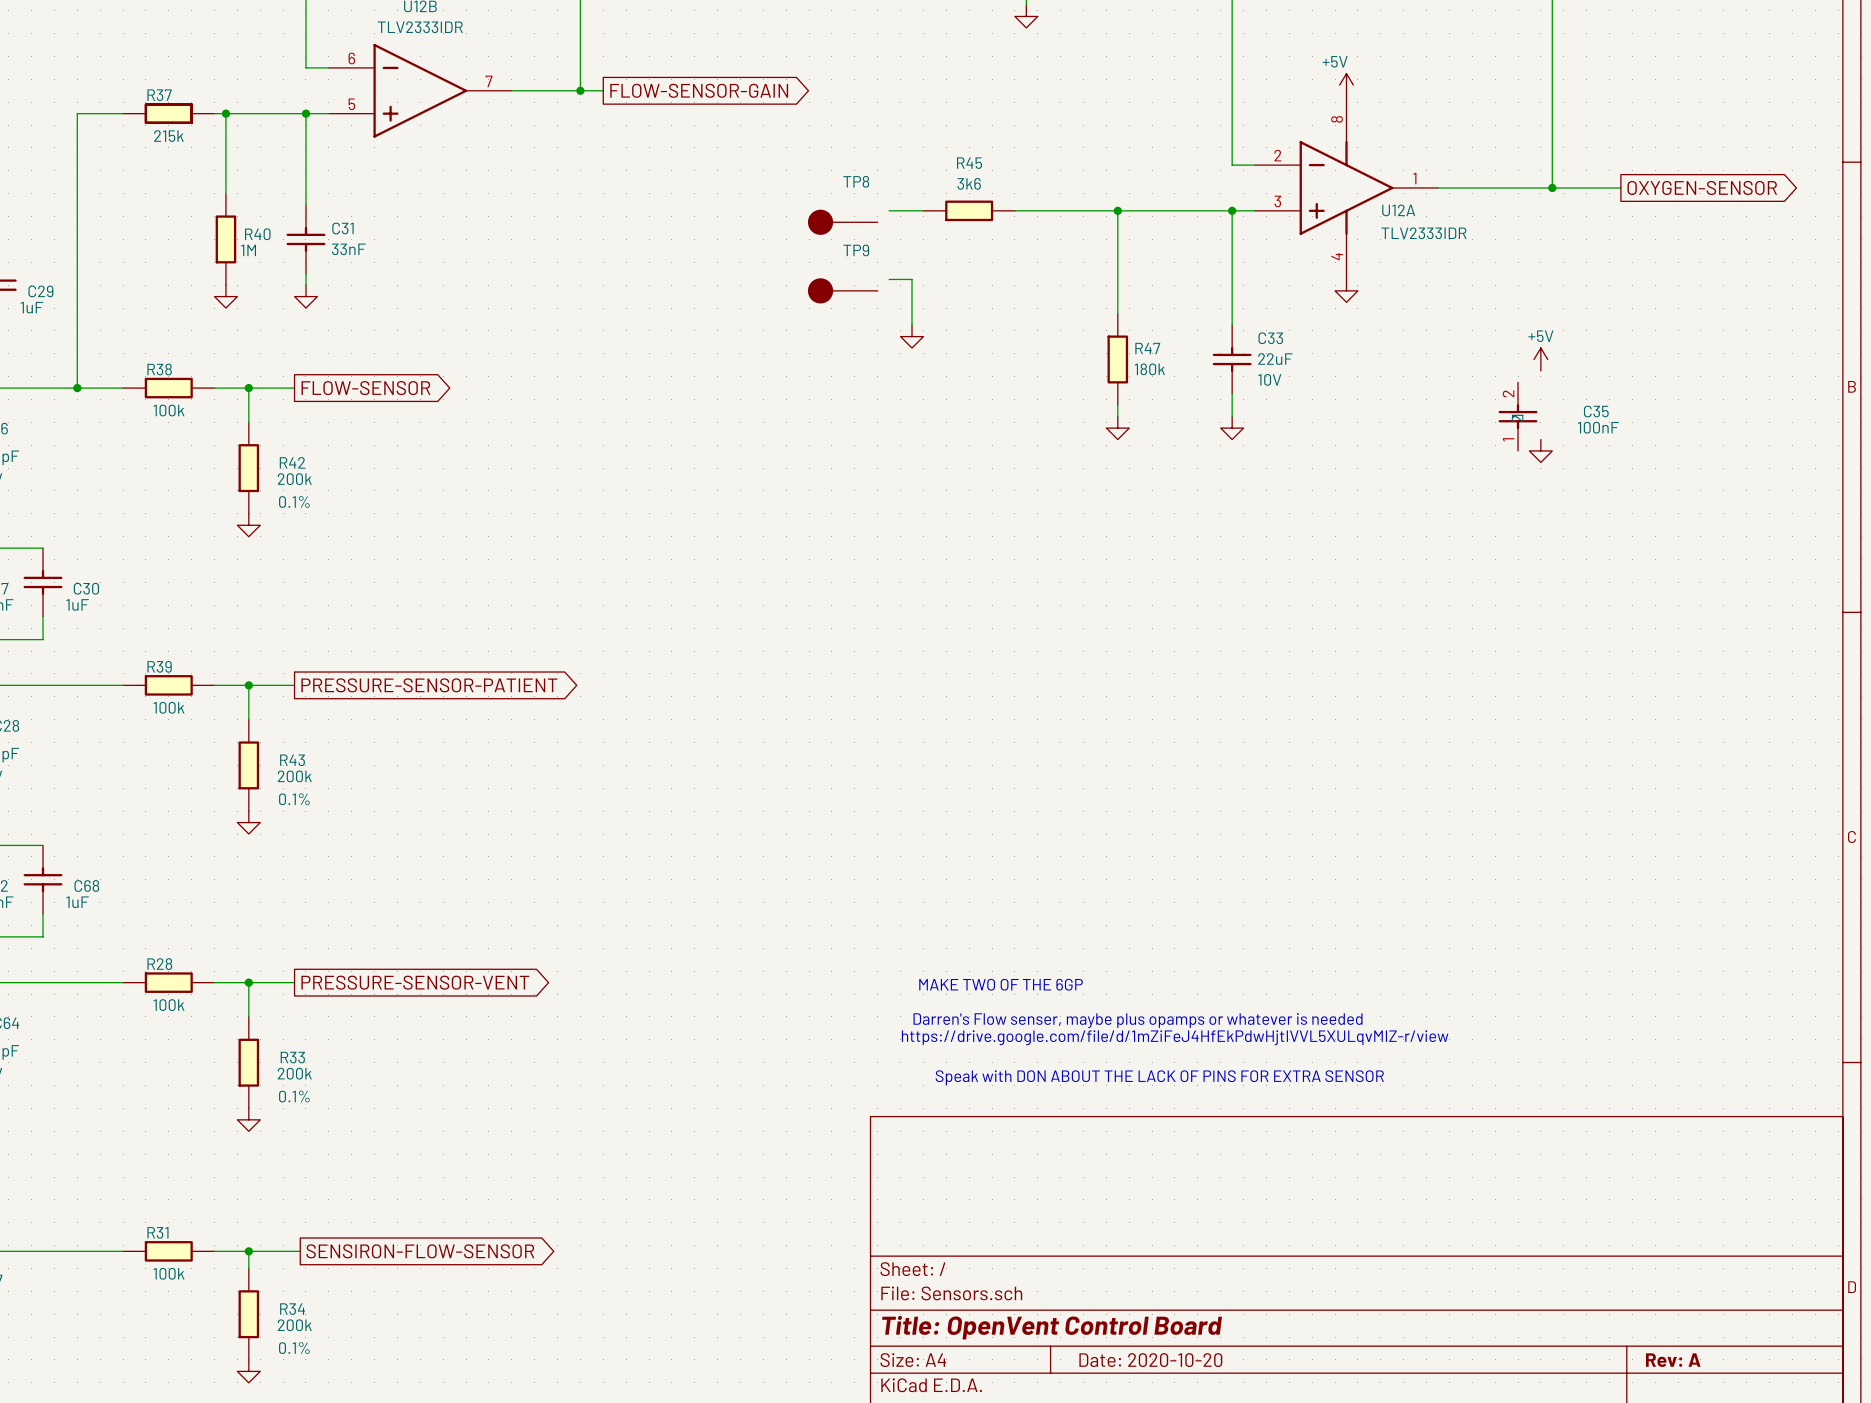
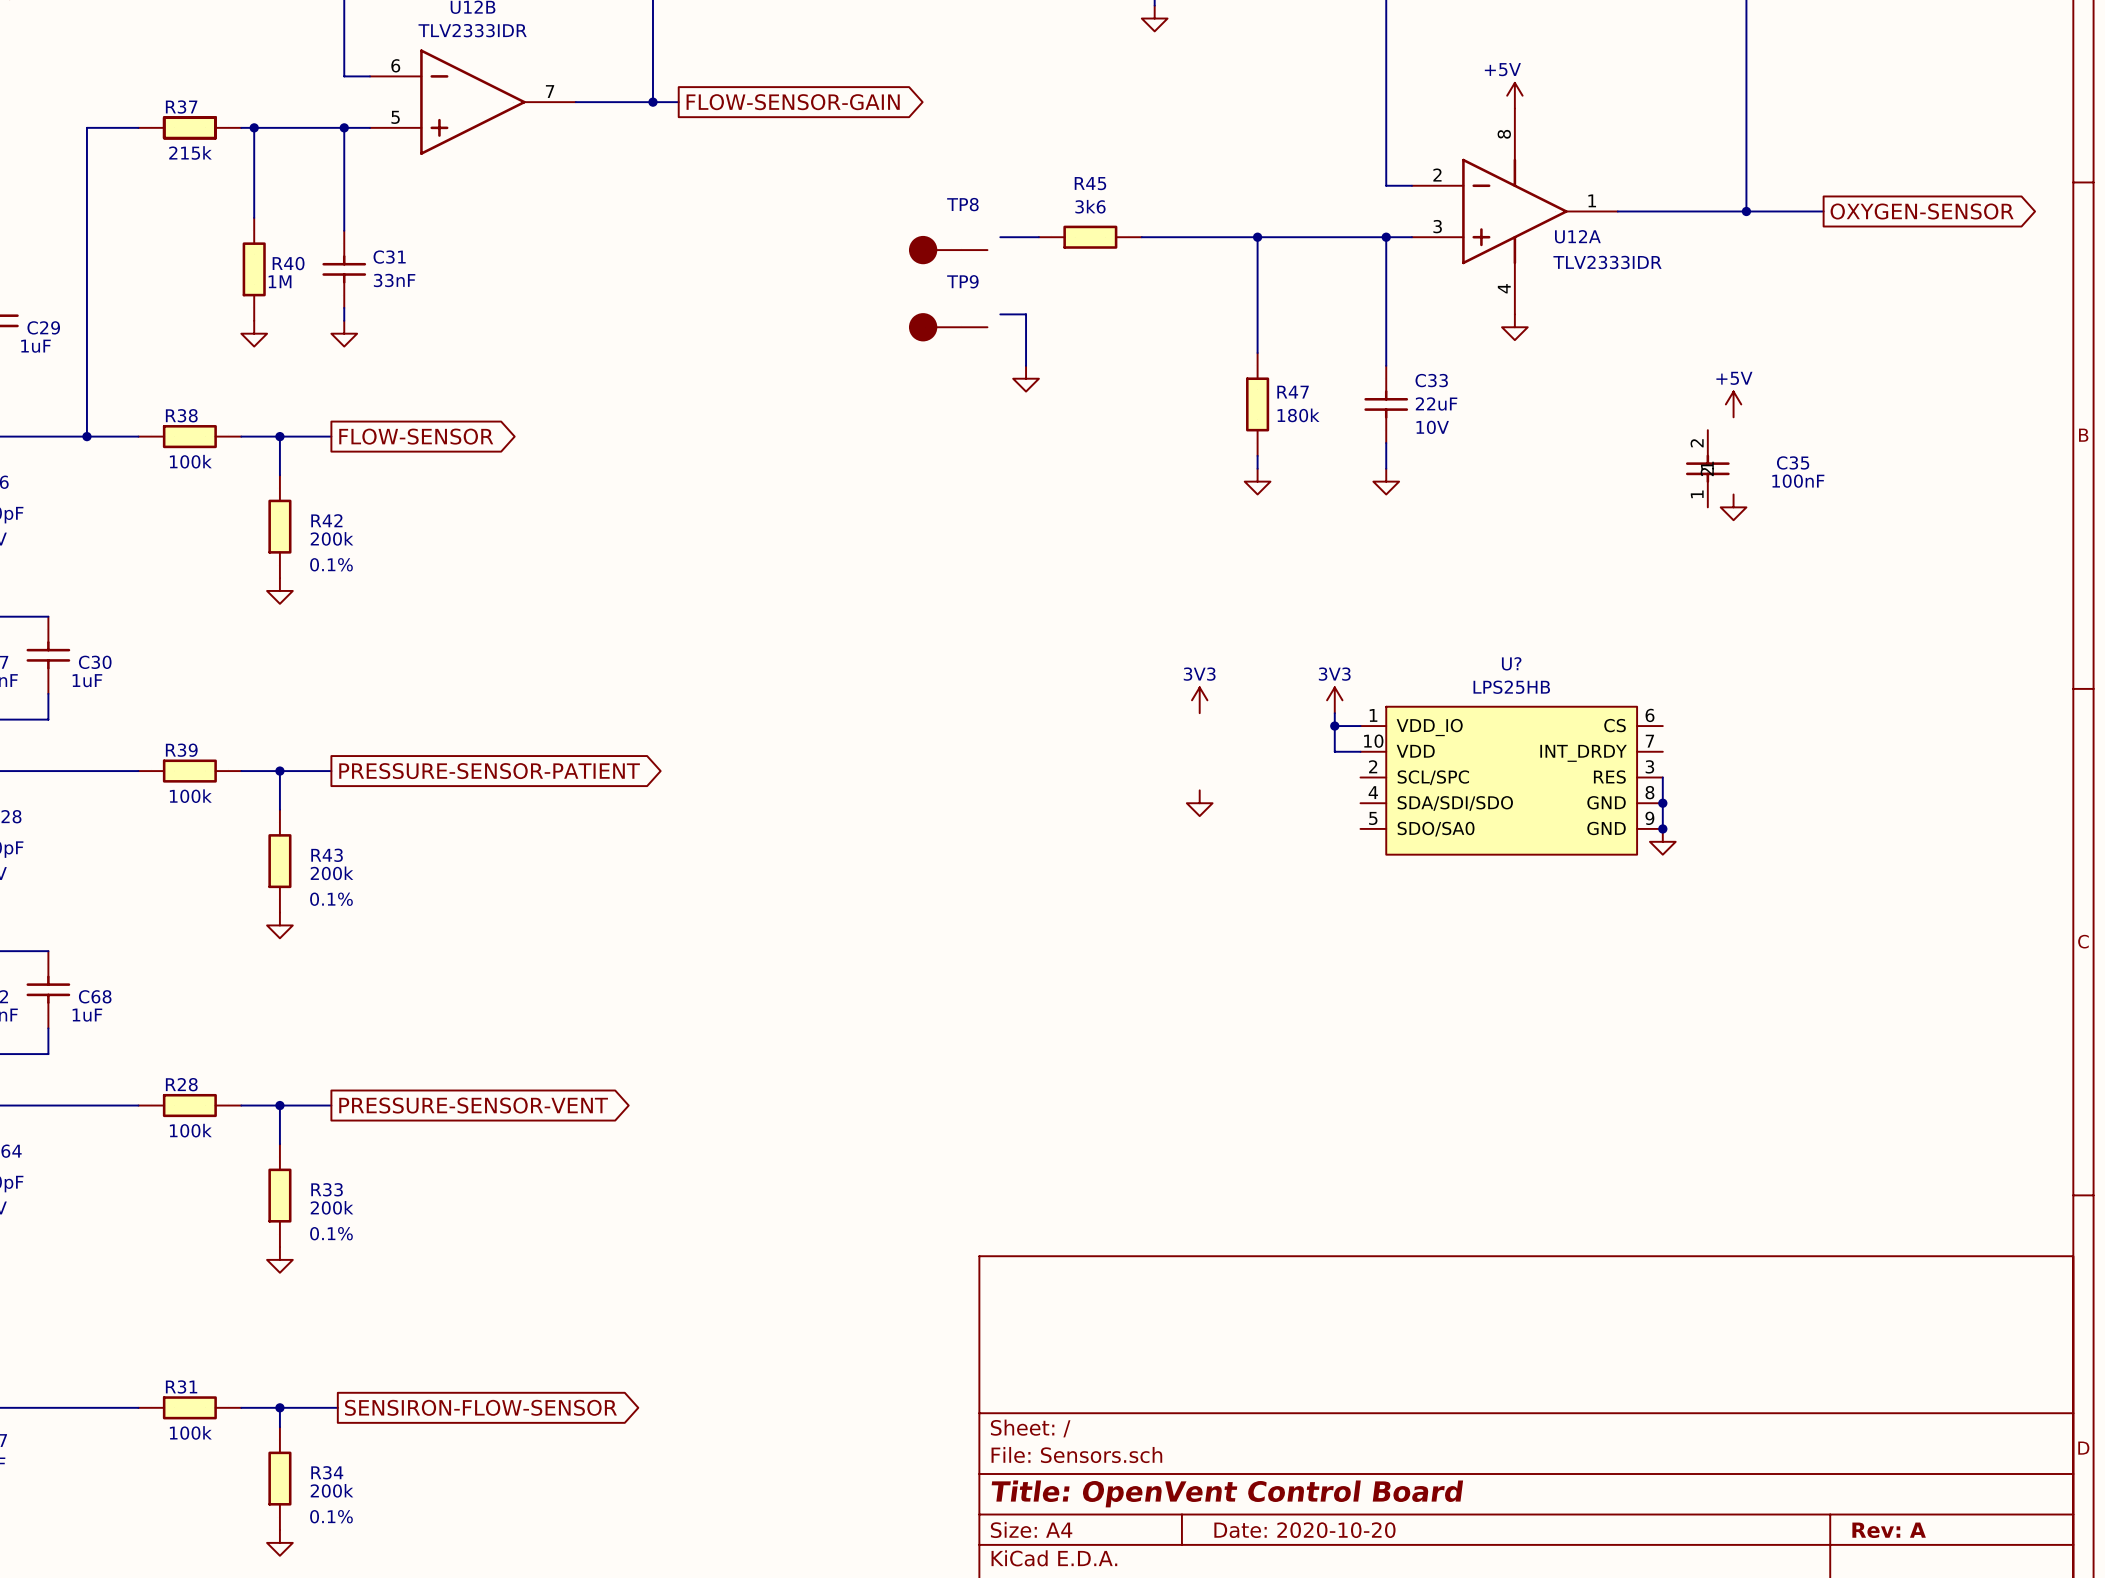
power symbol: none -> 3V3 (1199, 700)
power symbol: none -> 3V3 (1334, 700)
wire: none -> (1334, 713) (1334, 751) (1360, 751)
wire: none -> (1334, 726) (1360, 726)
junction: none -> (1334, 726)
wire: none -> (1662, 777) (1662, 828)
U?: none -> LPS25HB (1511, 780)
power symbol: none -> (1199, 803)
junction: none -> (1662, 803)
junction: none -> (1662, 828)
power symbol: none -> (1662, 841)
text: MAKE TWO OF THE 6GP (1001, 984) -> none
text: Darren's Flow senser, maybe plus opamps or whatever is needed (1138, 1020) -> none
text: https://drive.google.com/file/d/1mZiFeJ4HfEkPdwHjtIVVL5XULqvMIZ-r/view (1175, 1037) -> none
text: Speak with DON ABOUT THE LACK OF PINS FOR EXTRA SENSOR (1159, 1077) -> none

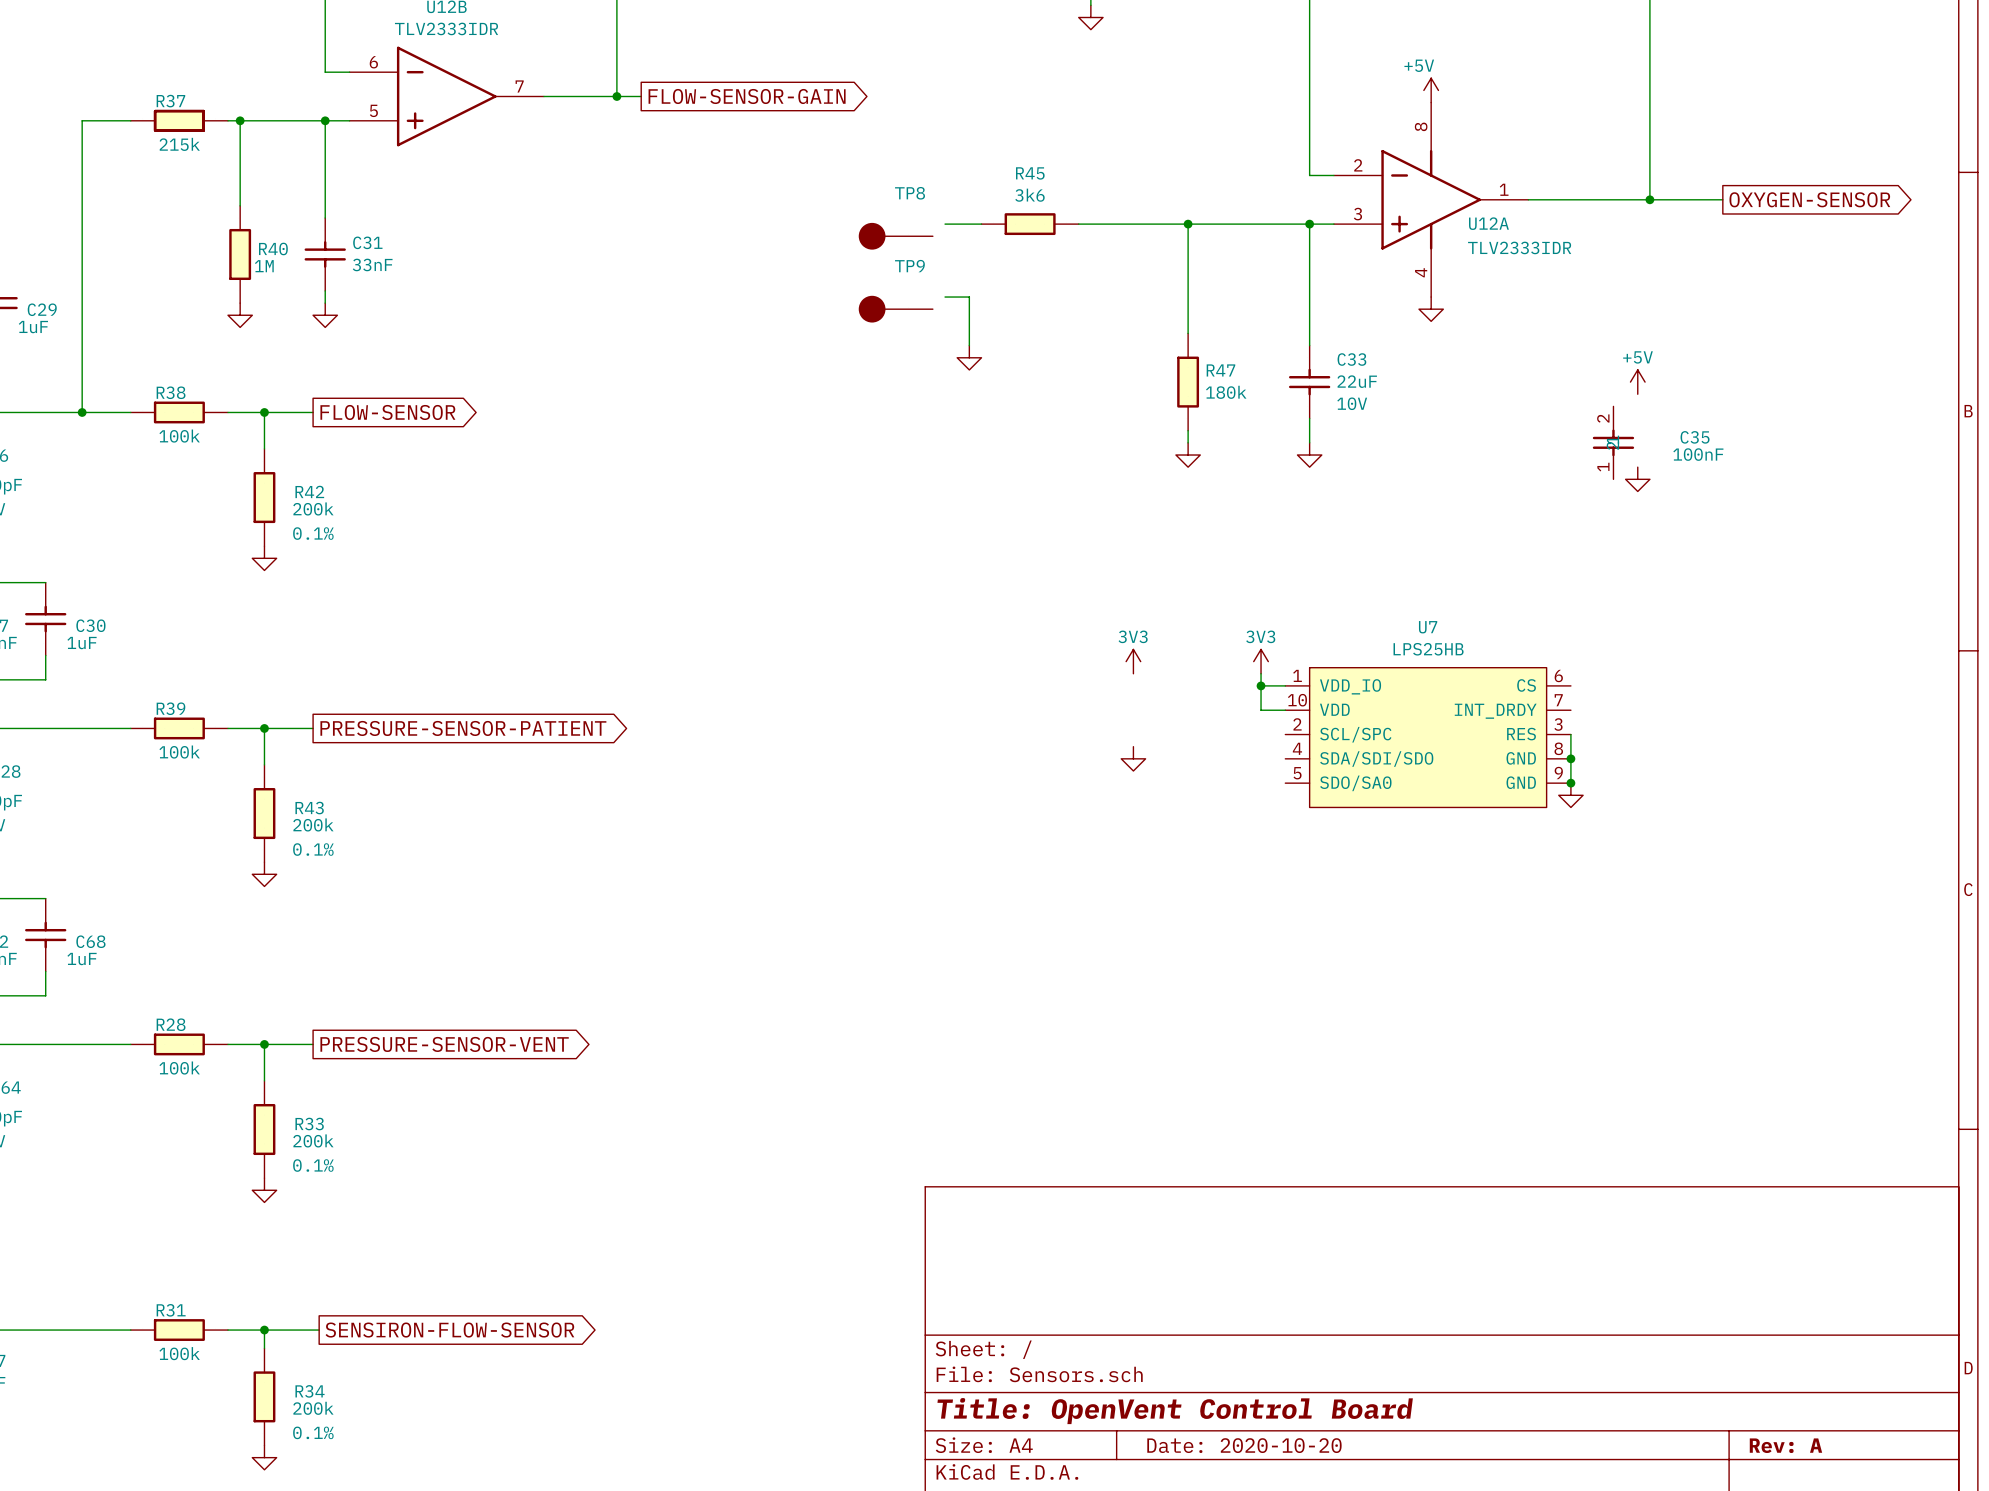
U? name: U? (1511, 663) -> U7 (1428, 627)

